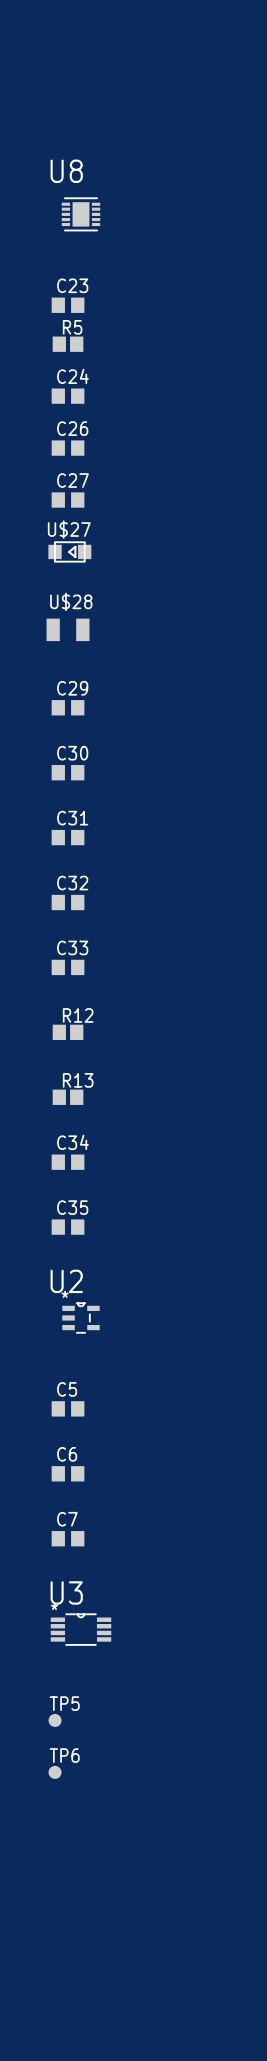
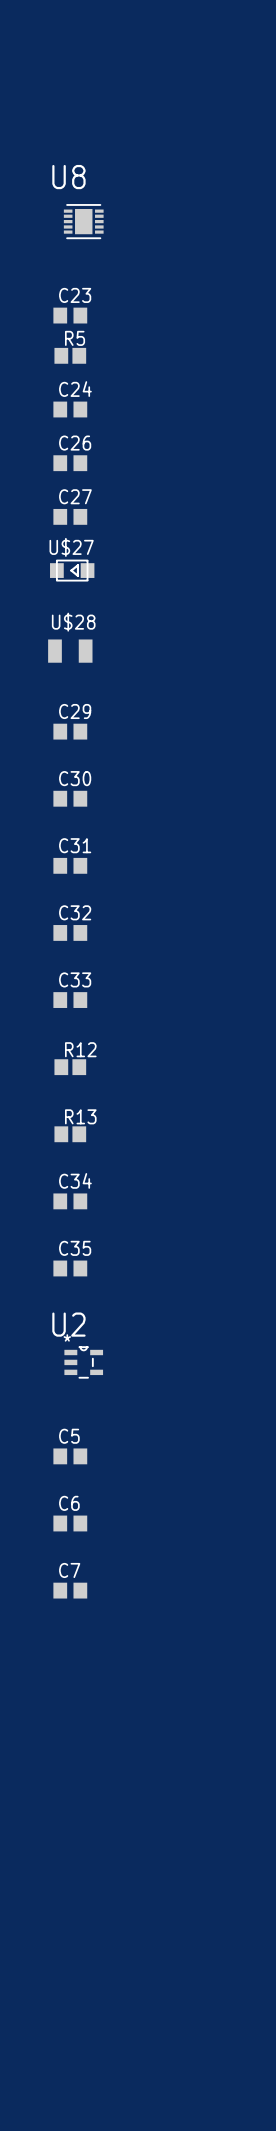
U3: (81, 1629) -> none
TP5: (55, 1720) -> none
TP6: (55, 1772) -> none

